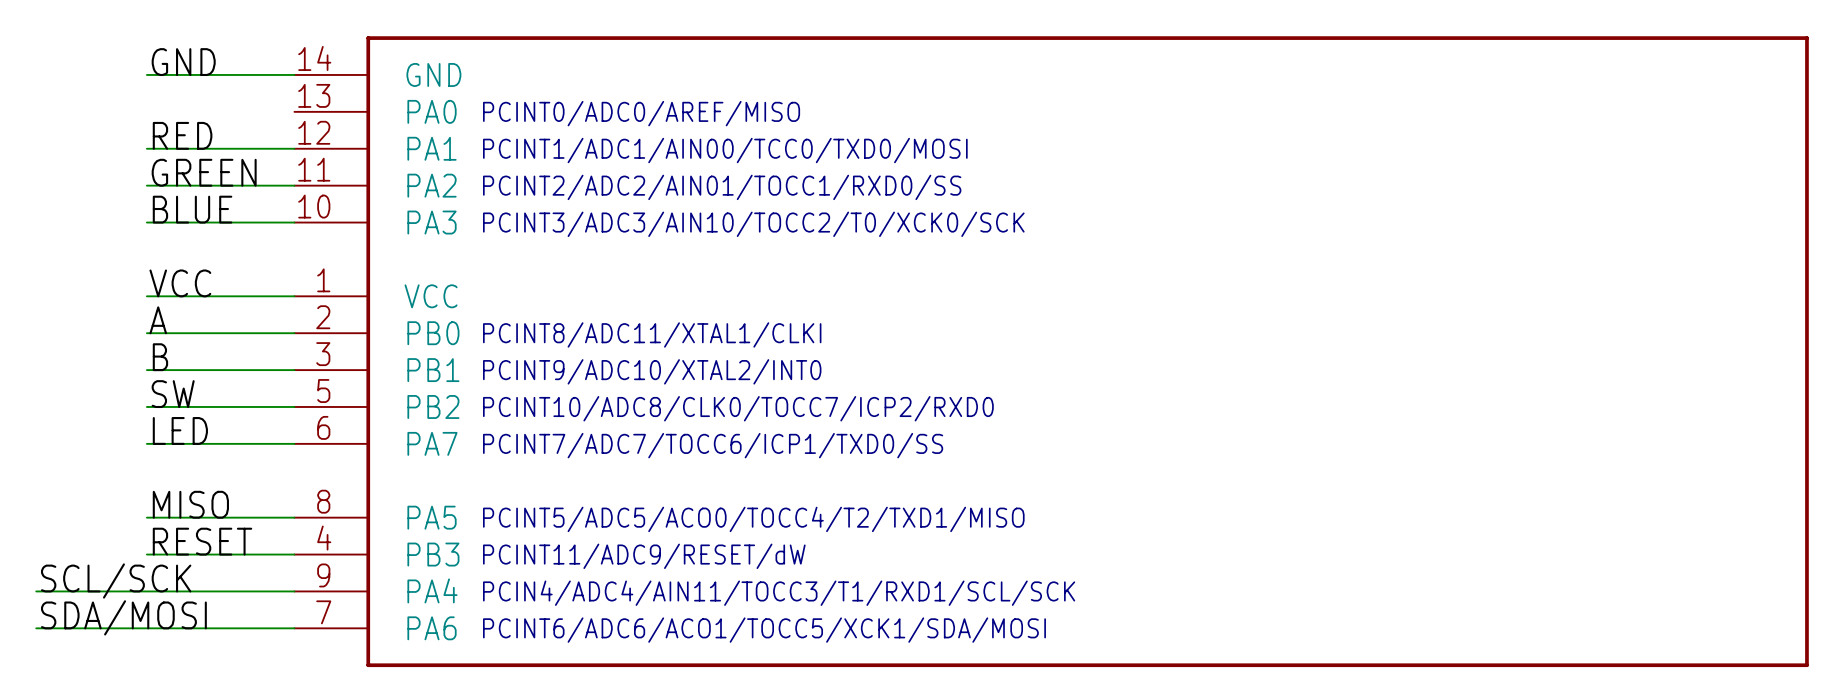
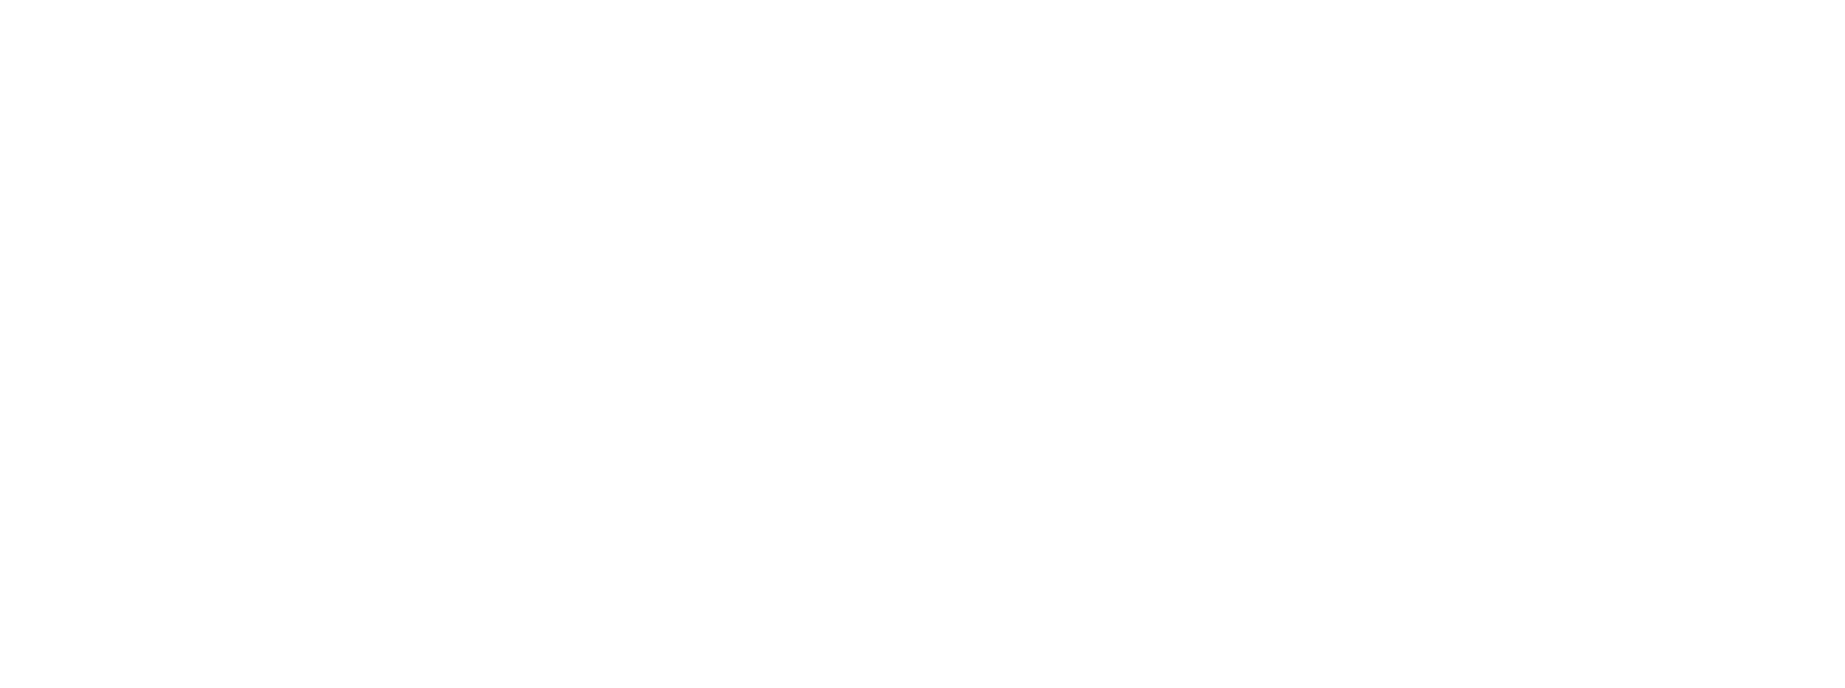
label: GND (183, 62) -> none
wire: (146, 74) (294, 74) -> none
label: RED (182, 135) -> none
wire: (146, 148) (294, 148) -> none
label: GREEN (204, 172) -> none
wire: (146, 185) (294, 185) -> none
label: BLUE (192, 209) -> none
wire: (146, 222) (294, 222) -> none
label: VCC (180, 283) -> none
wire: (146, 296) (294, 296) -> none
label: A (158, 320) -> none
wire: (146, 333) (294, 333) -> none
part: (1051, 351) -> none
label: B (160, 357) -> none
wire: (146, 370) (294, 370) -> none
label: SW (173, 394) -> none
wire: (146, 406) (294, 406) -> none
label: LED (180, 430) -> none
wire: (146, 443) (294, 443) -> none
label: MISO (190, 504) -> none
wire: (146, 517) (294, 517) -> none
label: RESET (202, 541) -> none
wire: (146, 554) (294, 554) -> none
label: SCL/SCK (116, 580) -> none
wire: (36, 591) (294, 591) -> none
label: SDA/MOSI (123, 617) -> none
wire: (36, 628) (294, 628) -> none

